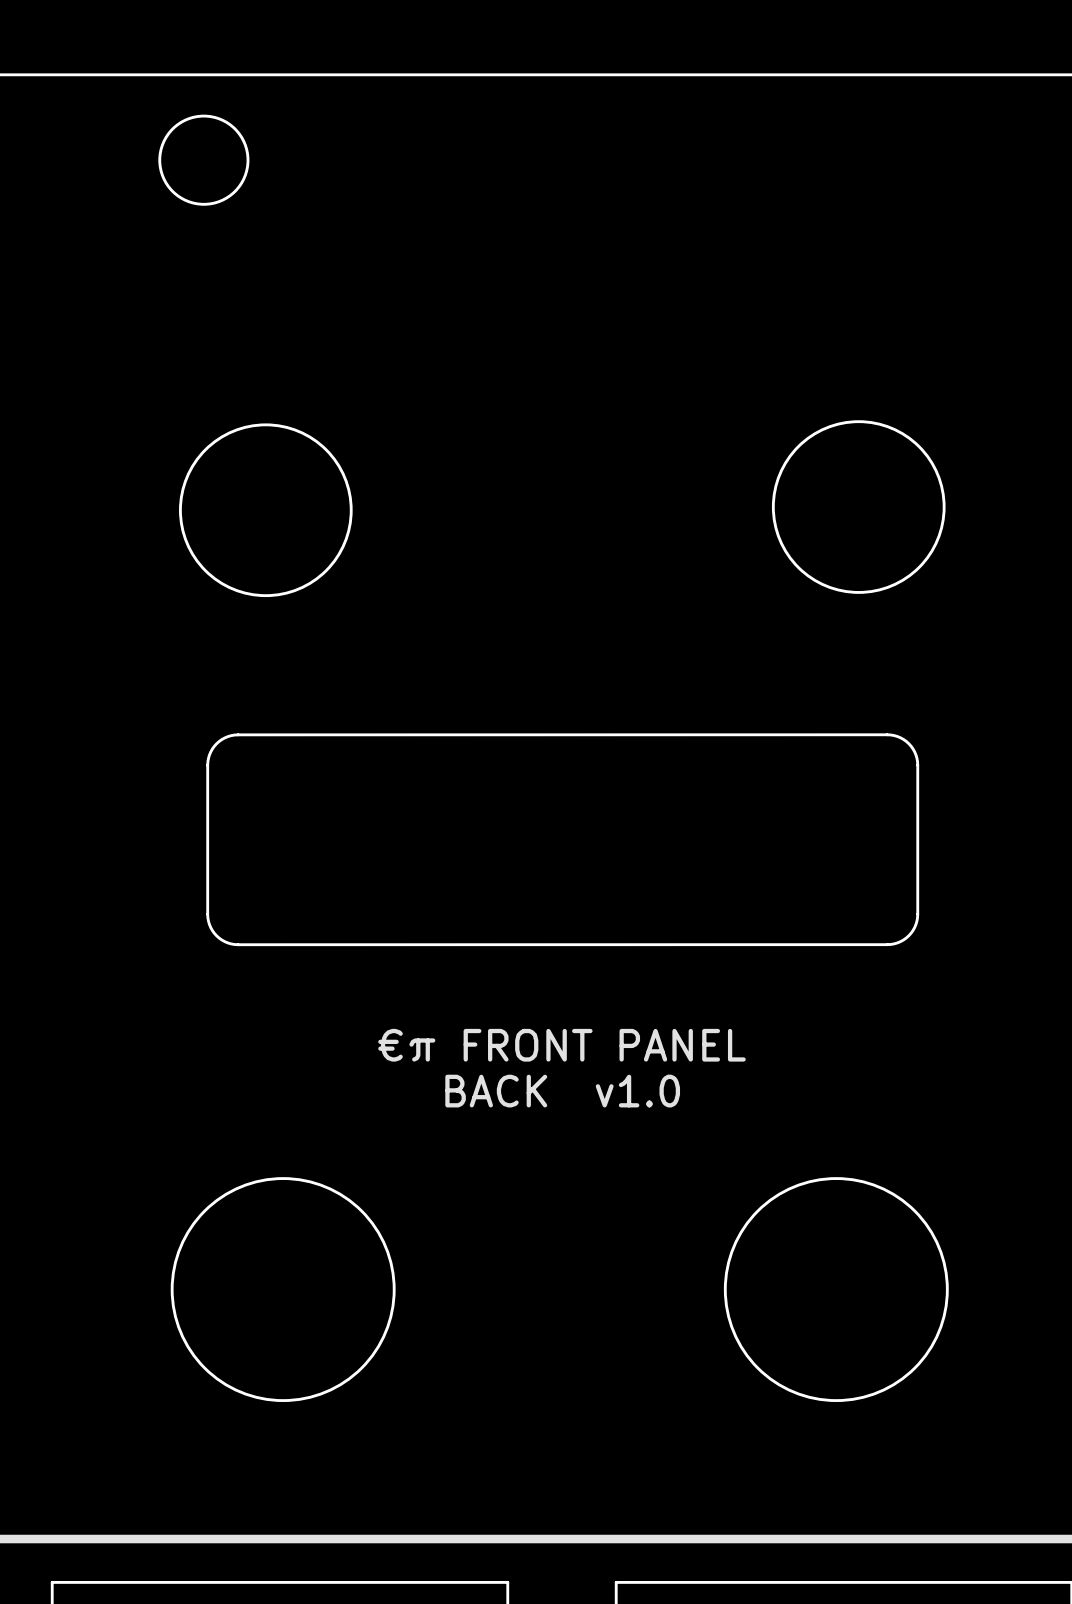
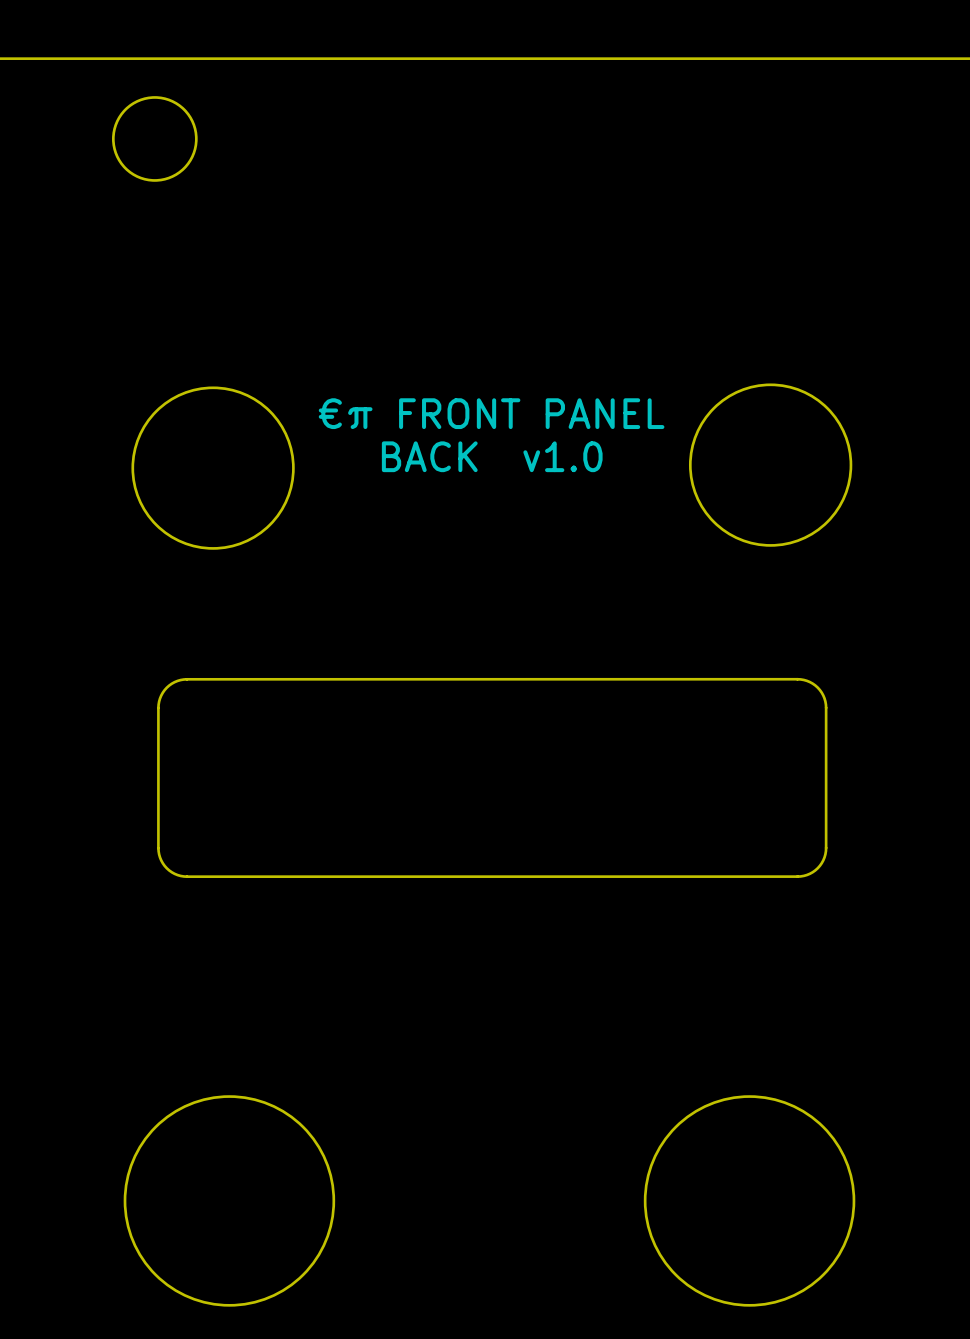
text position: €π FRONT PANEL (561, 1045) -> €π FRONT PANEL (491, 413)
text position: BACK v1.0 (562, 1091) -> BACK v1.0 (492, 456)

